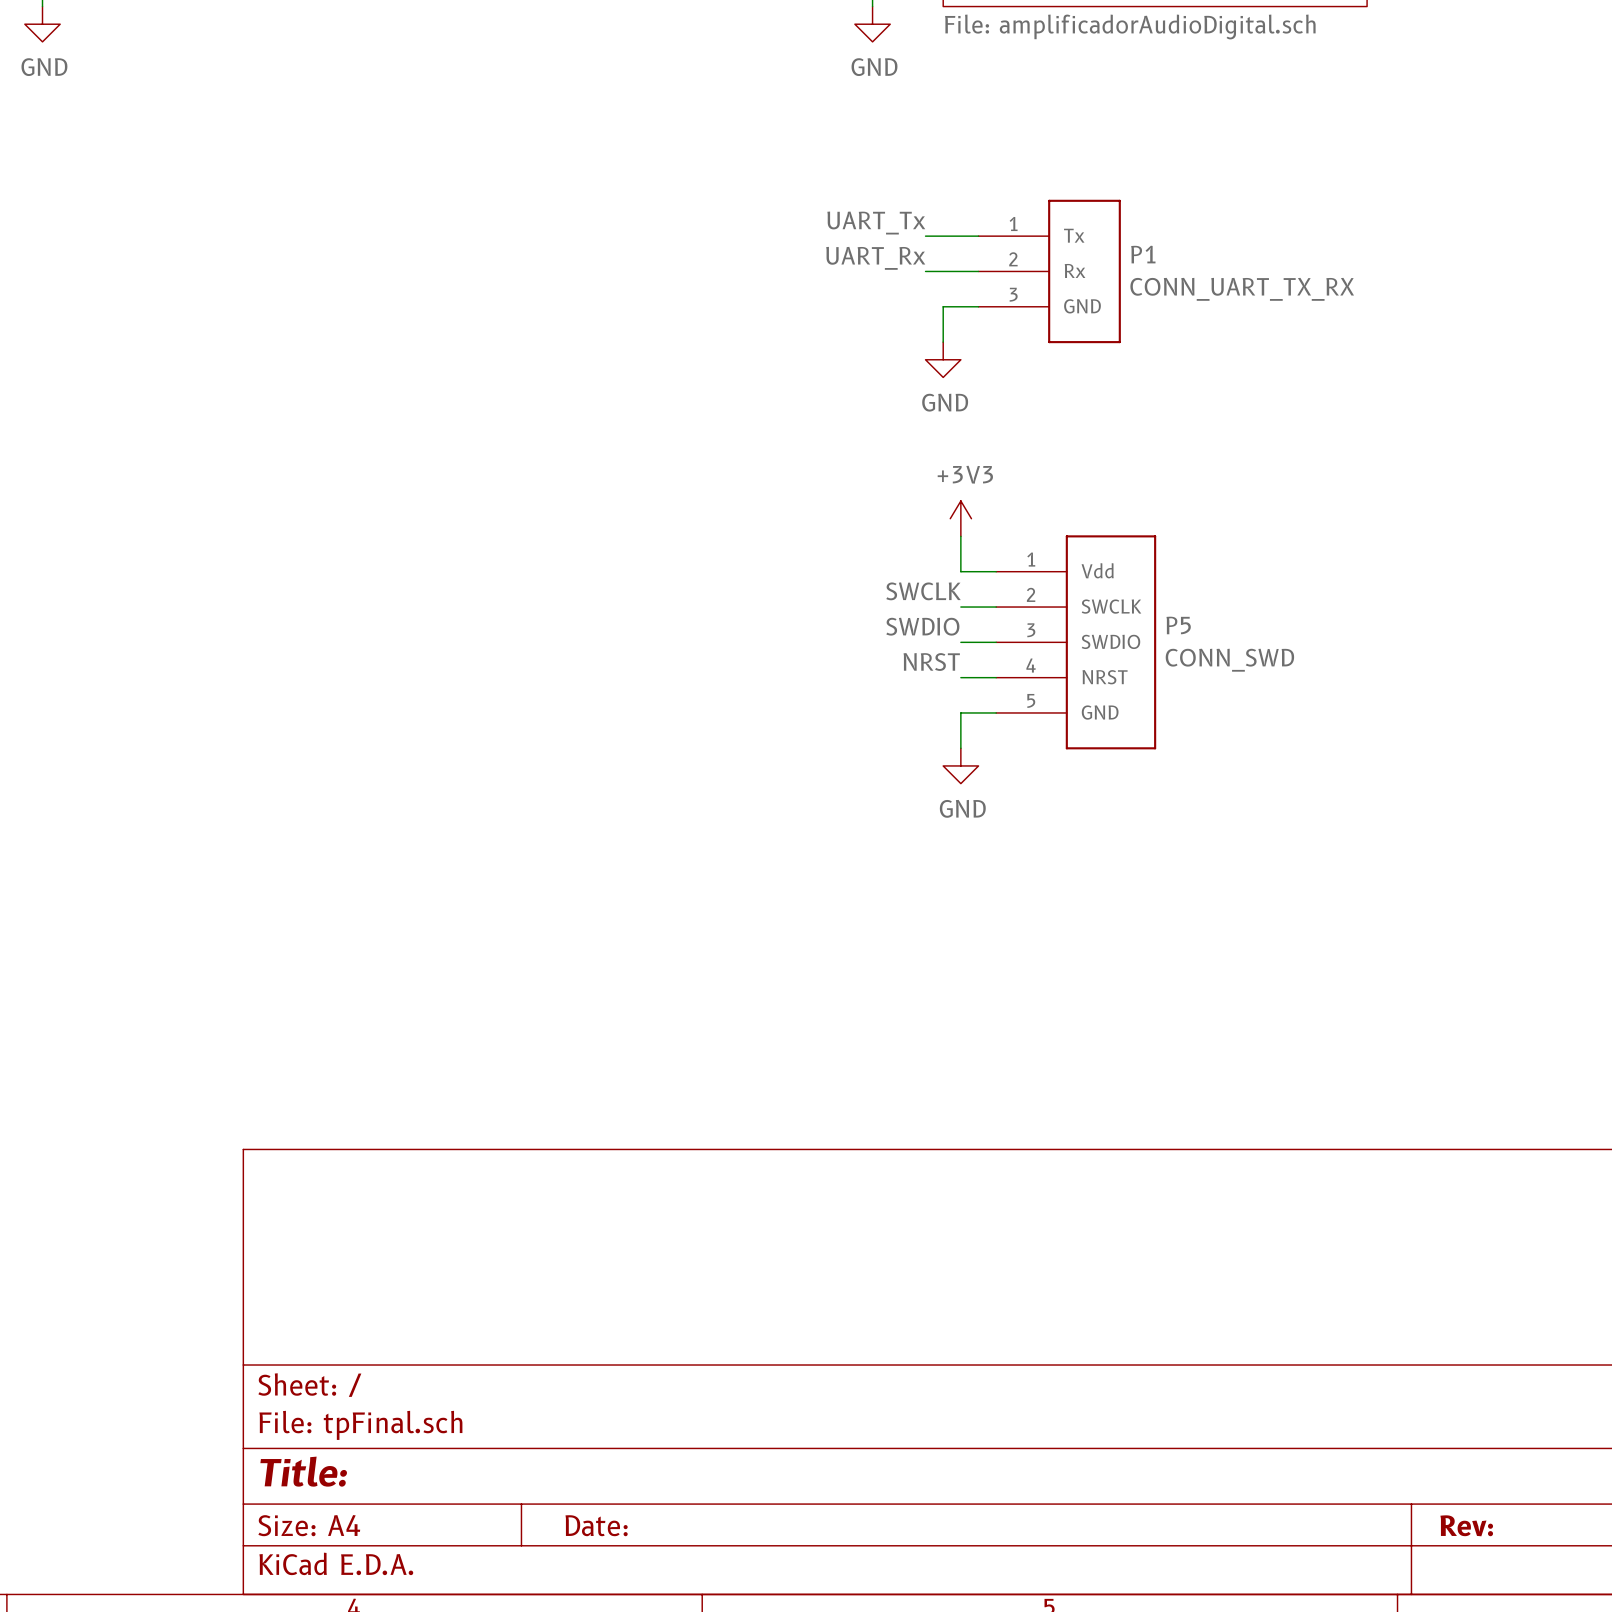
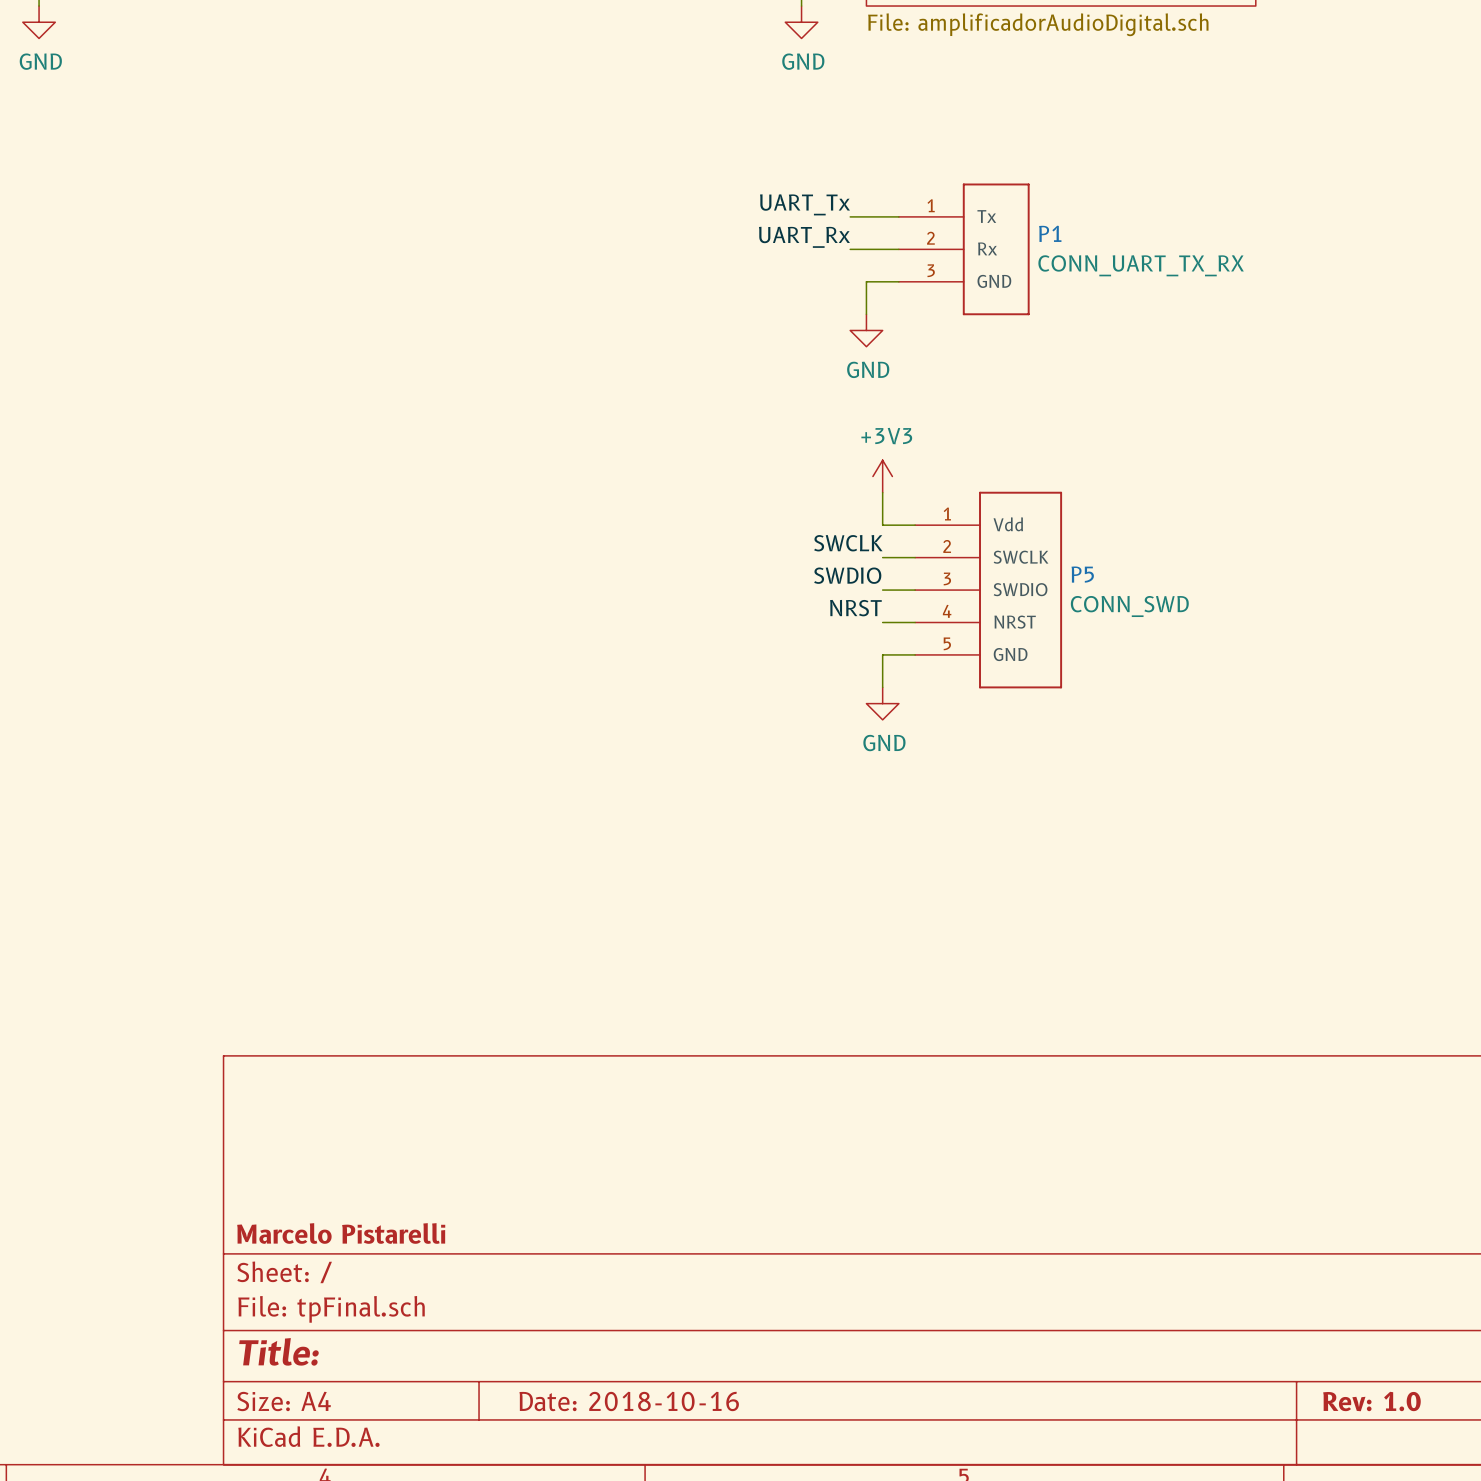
title block: none -> Marcelo Pistarelli (341, 1233)
title block: Date: (596, 1525) -> Date: 2018-10-16 (629, 1401)
title block: Rev: (1466, 1525) -> Rev: 1.0 (1371, 1401)

